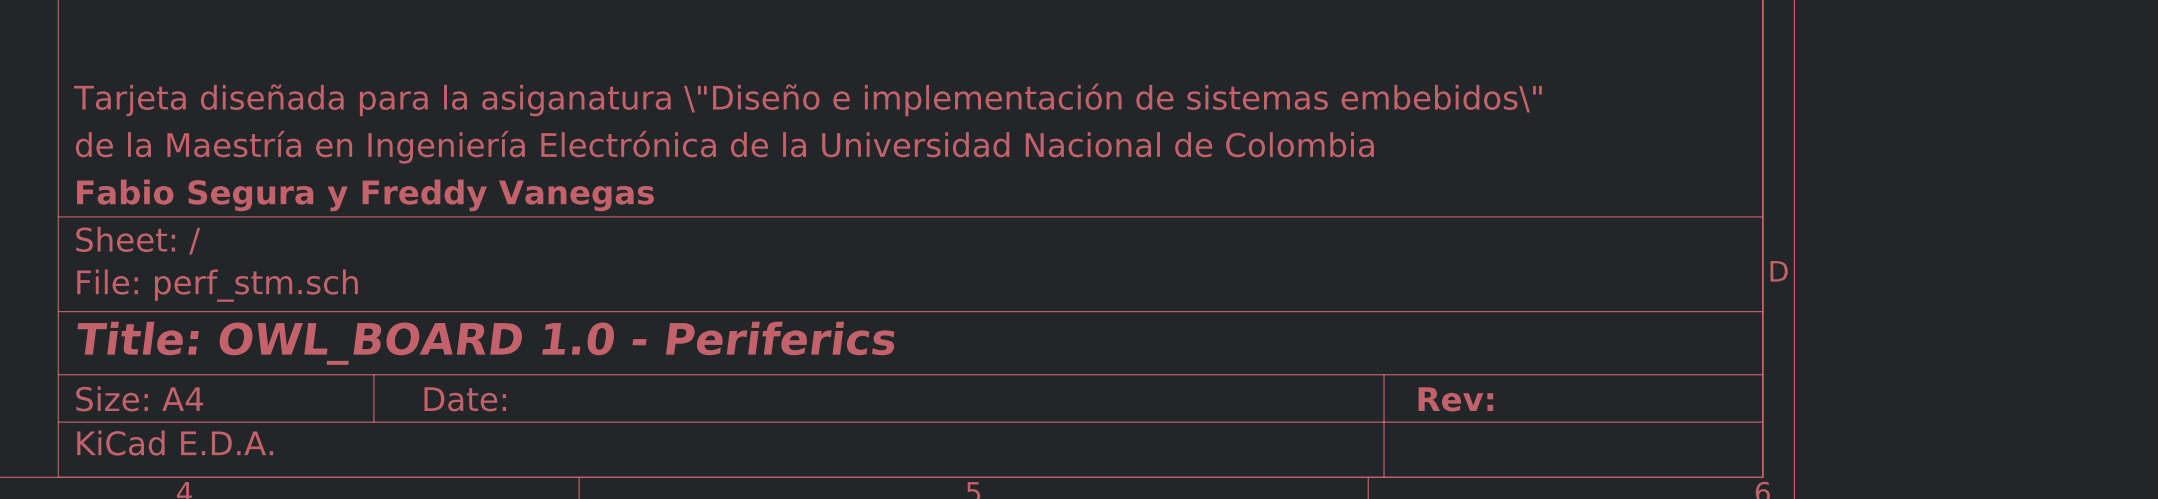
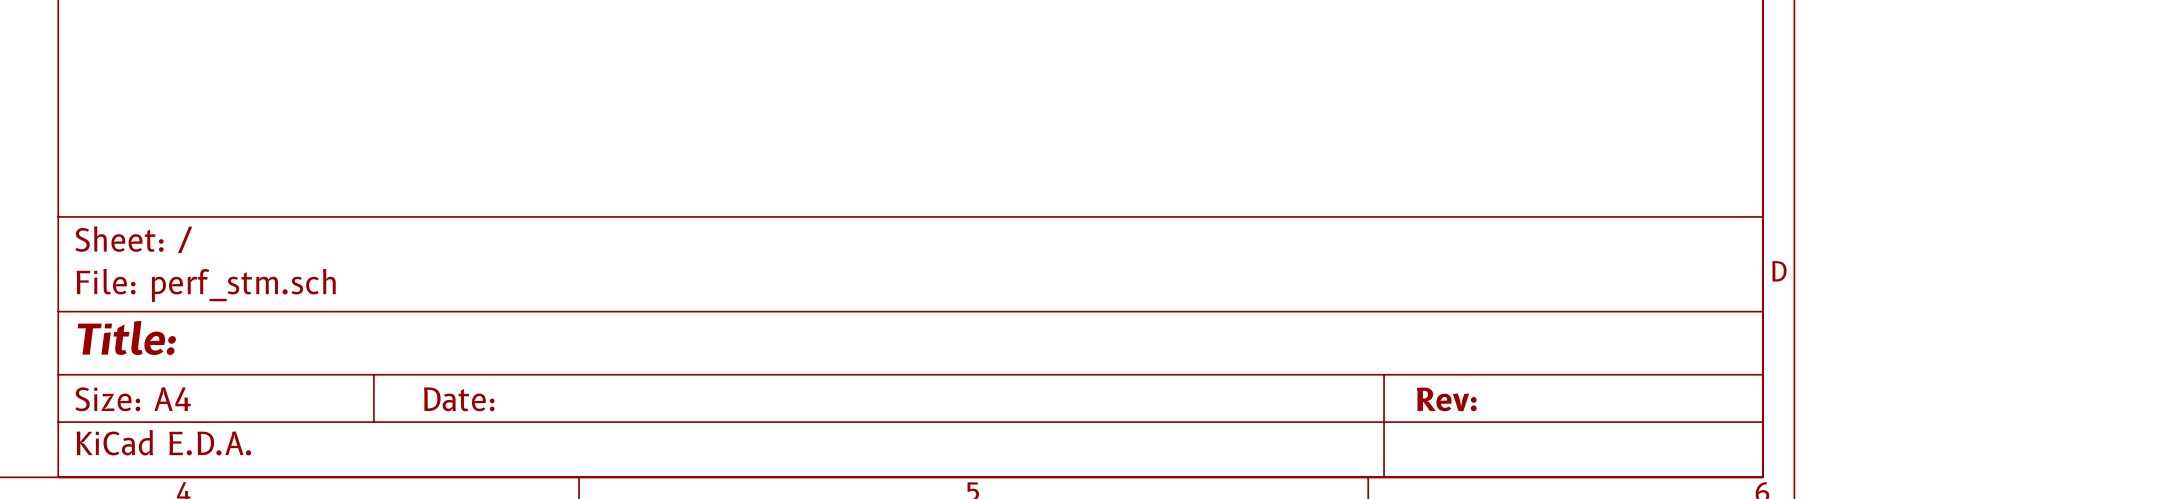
title block: Tarjeta diseñada para la asiganatura \"Diseño e implementación de sistemas embebidos\" (807, 99) -> none
title block: de la Maestría en Ingeniería Electrónica de la Universidad Nacional de Colombia (724, 147) -> none
title block: Fabio Segura y Freddy Vanegas (365, 195) -> none
title block: Title: OWL_BOARD 1.0 - Periferics (485, 343) -> Title: (126, 337)

